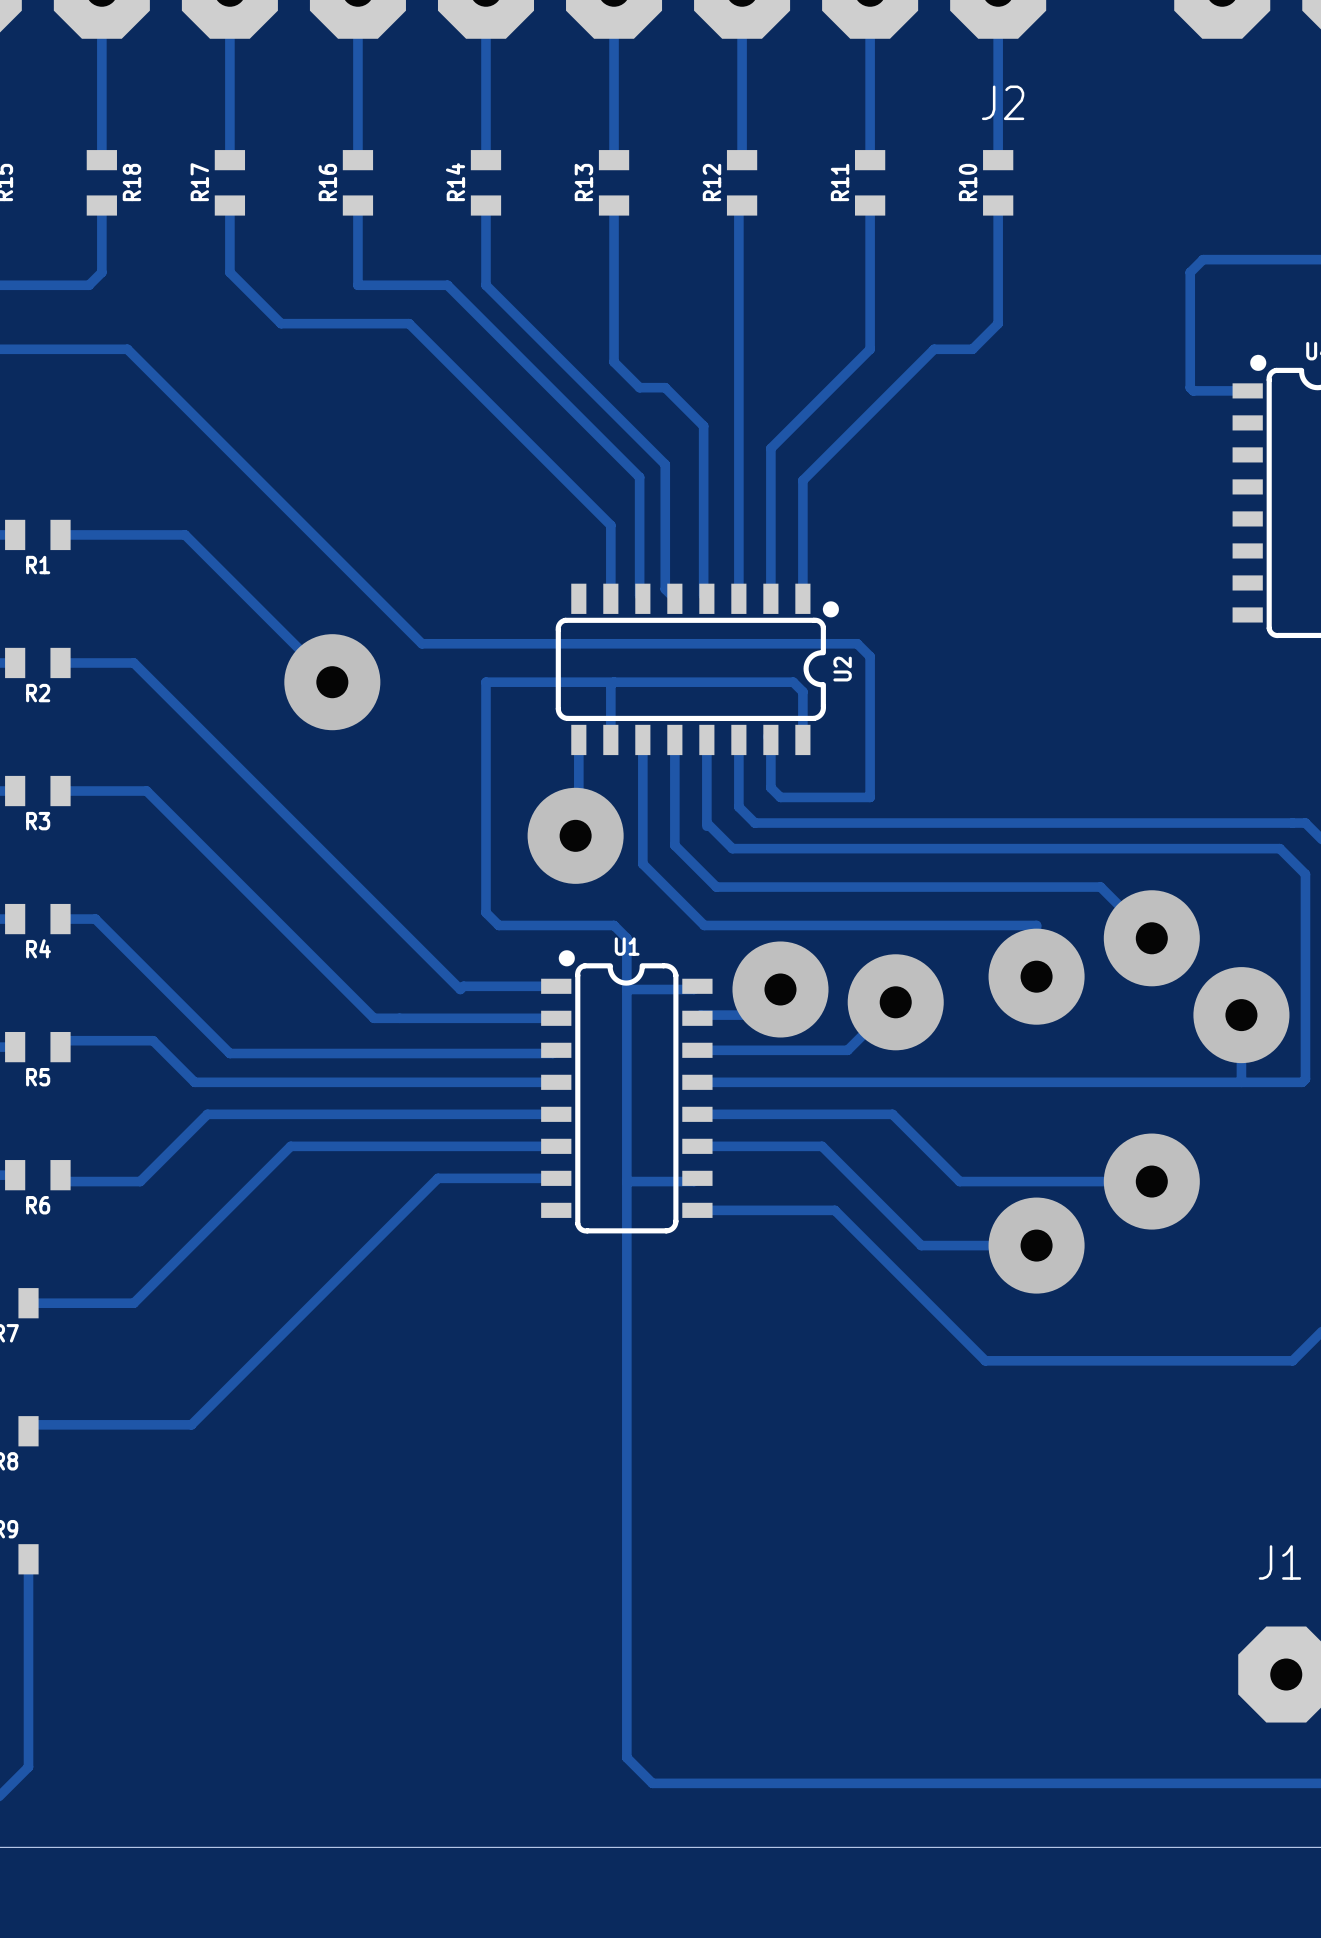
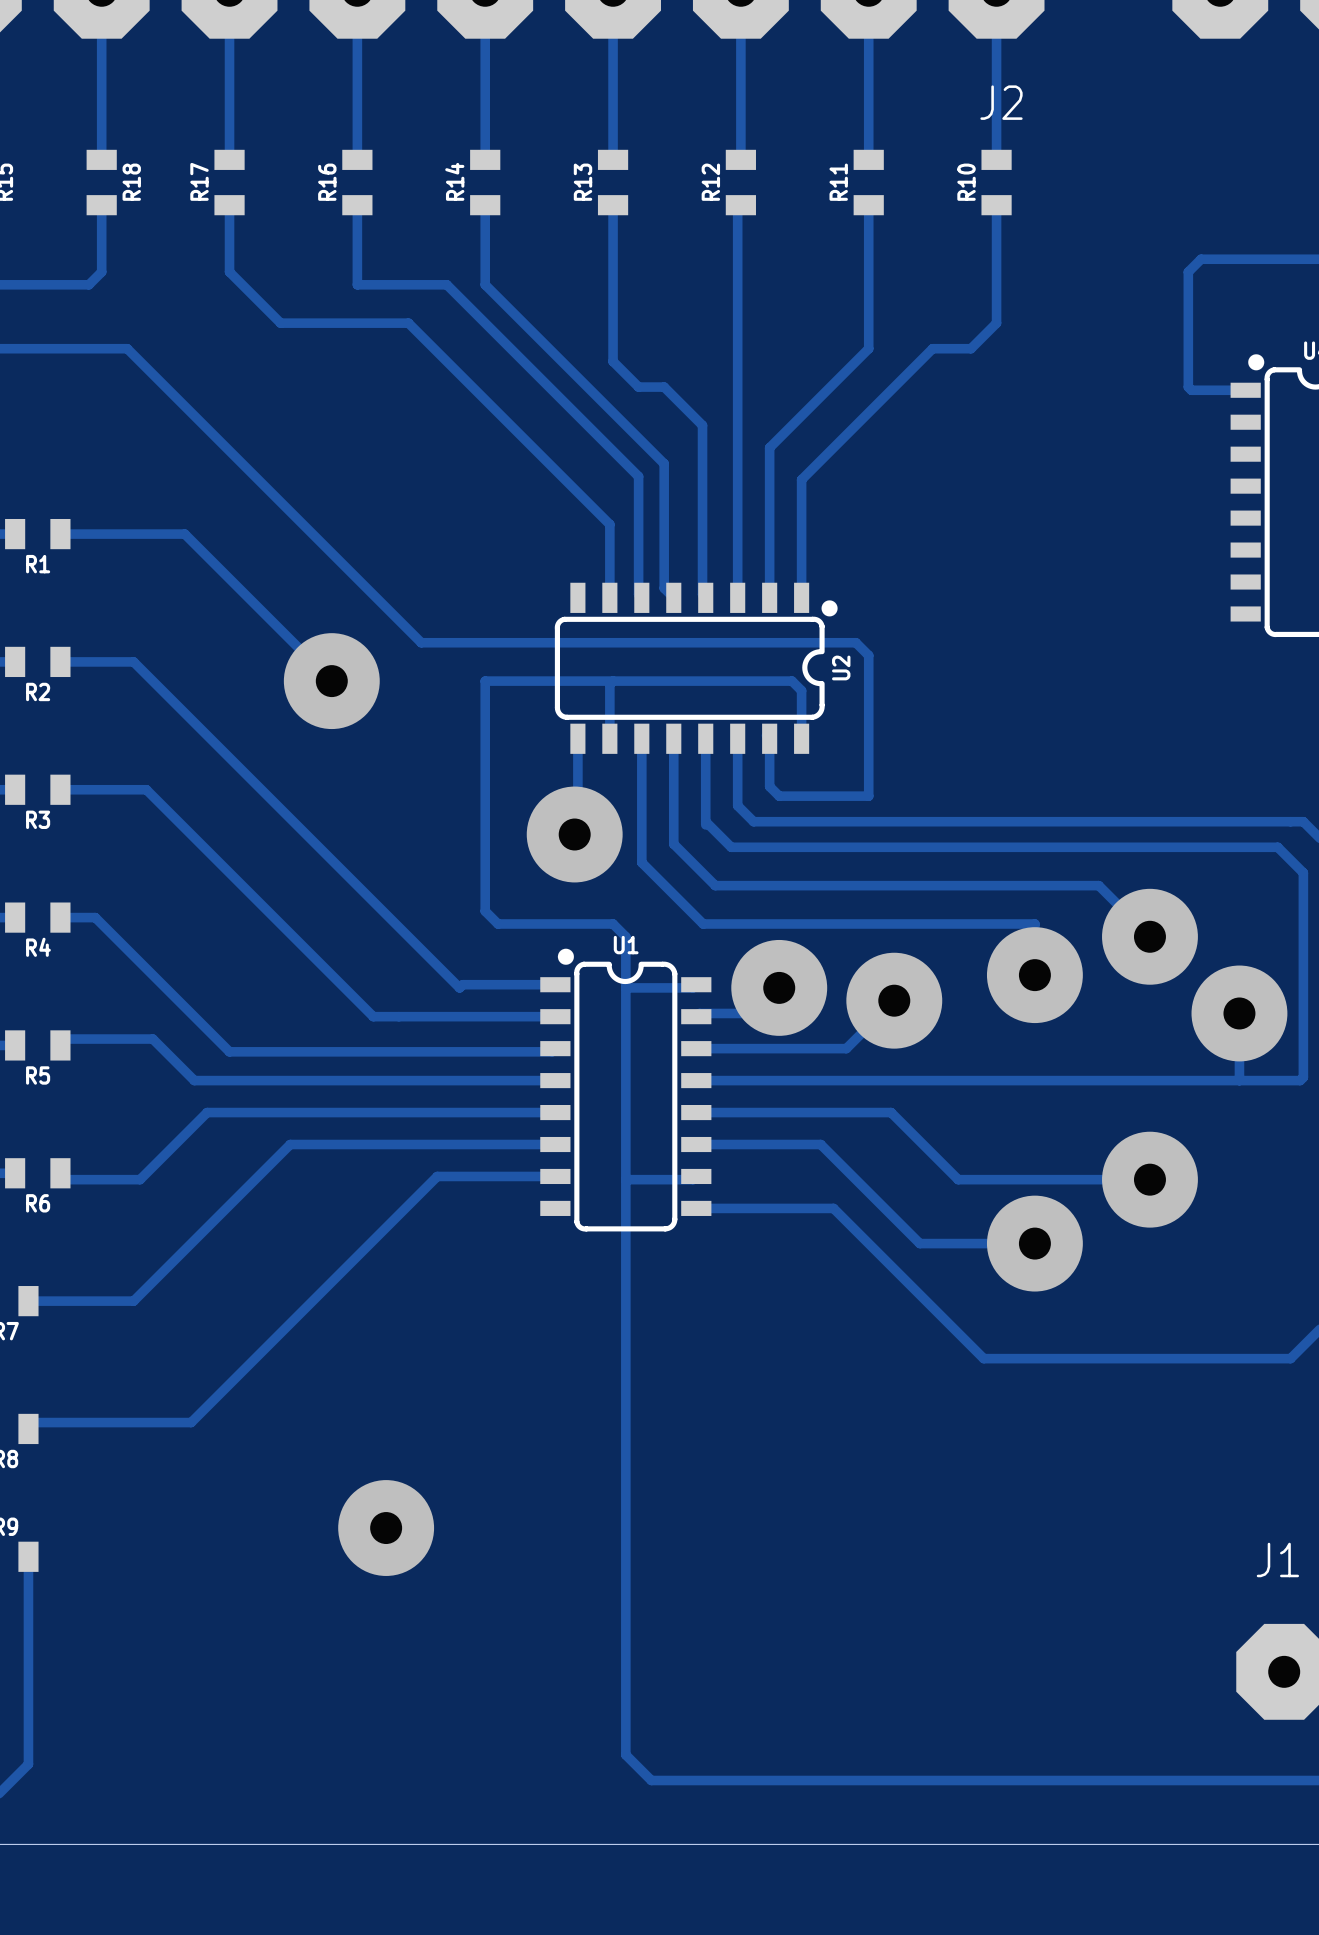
via: none -> (386, 1528)

